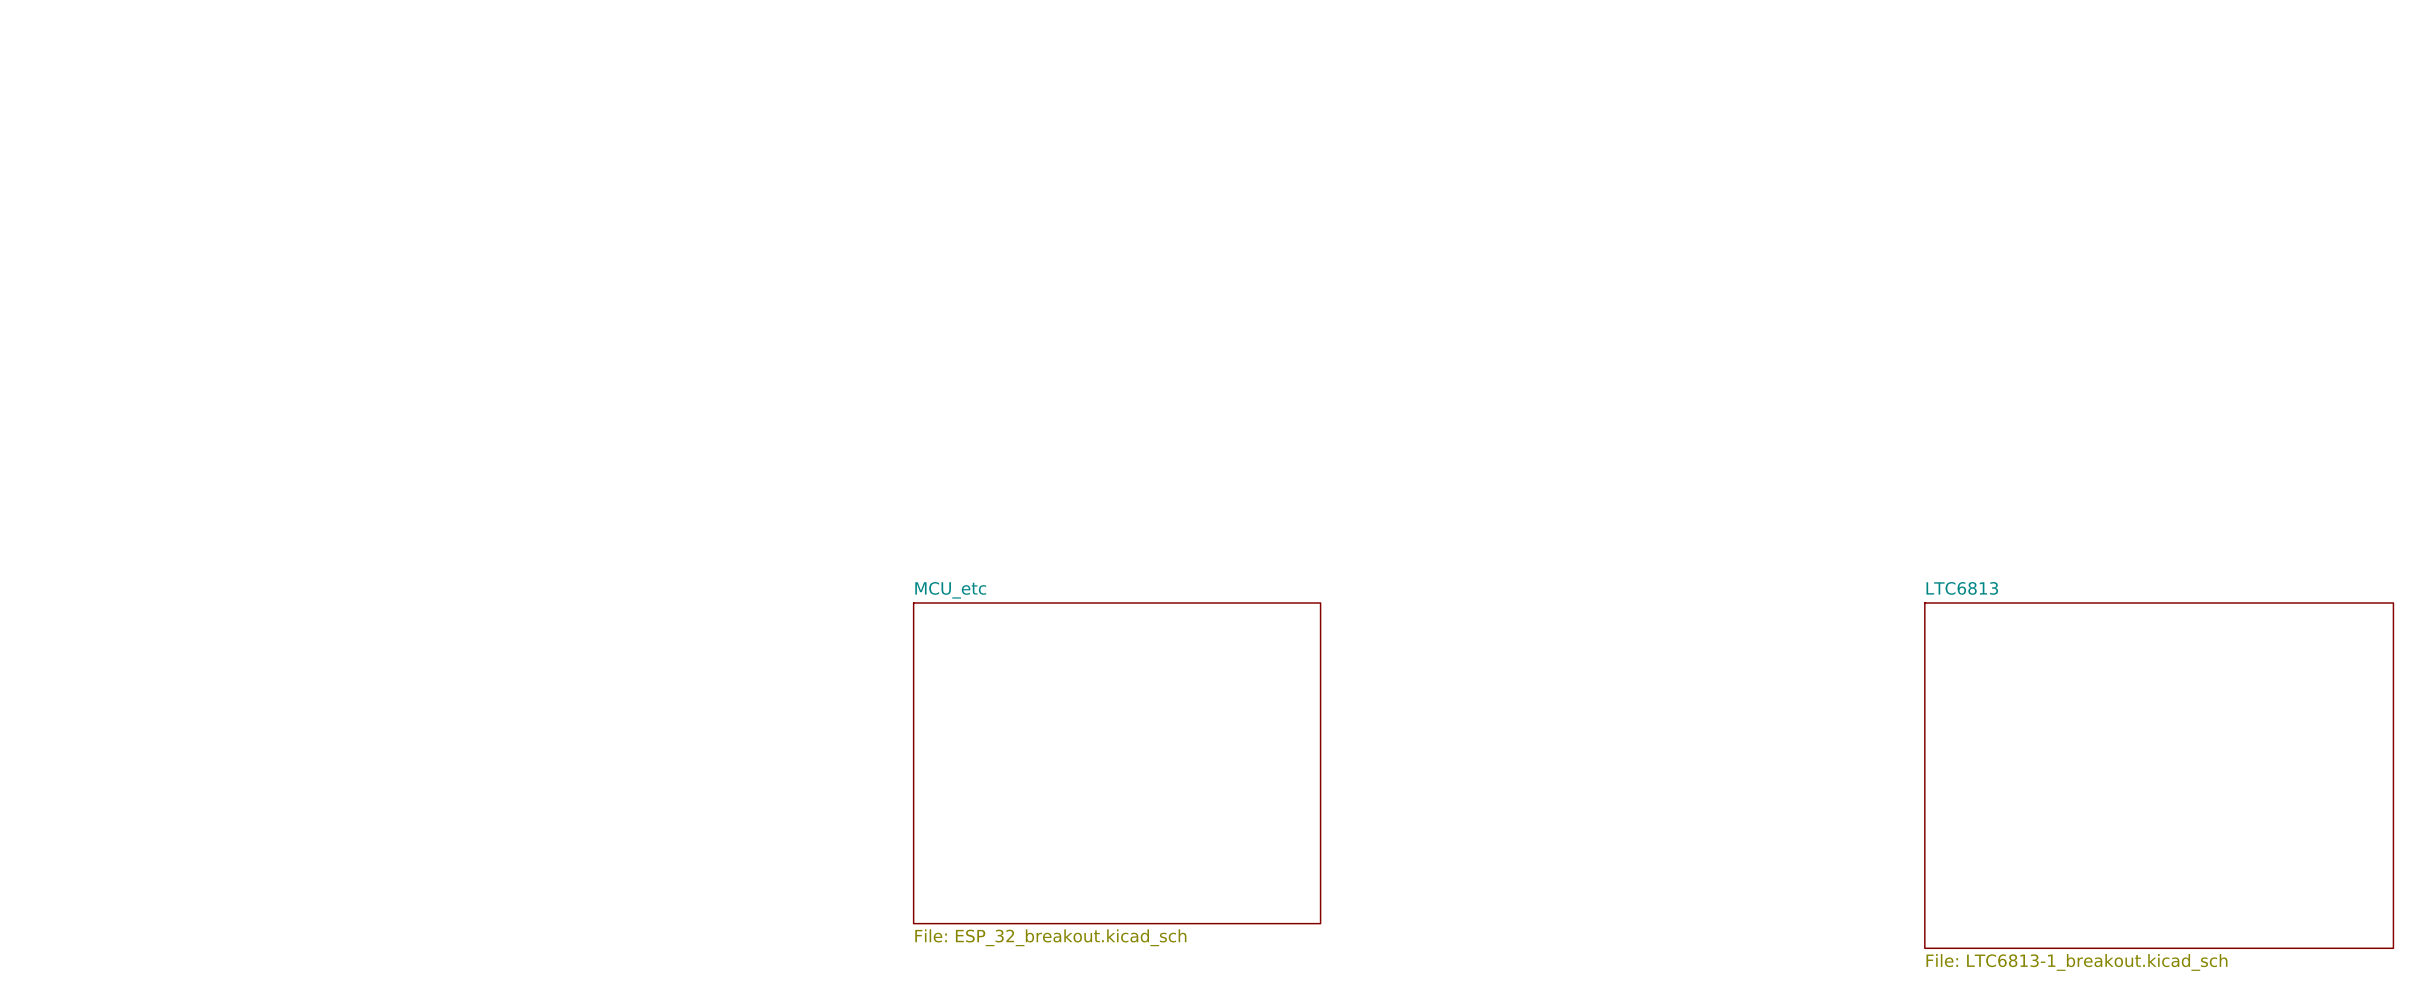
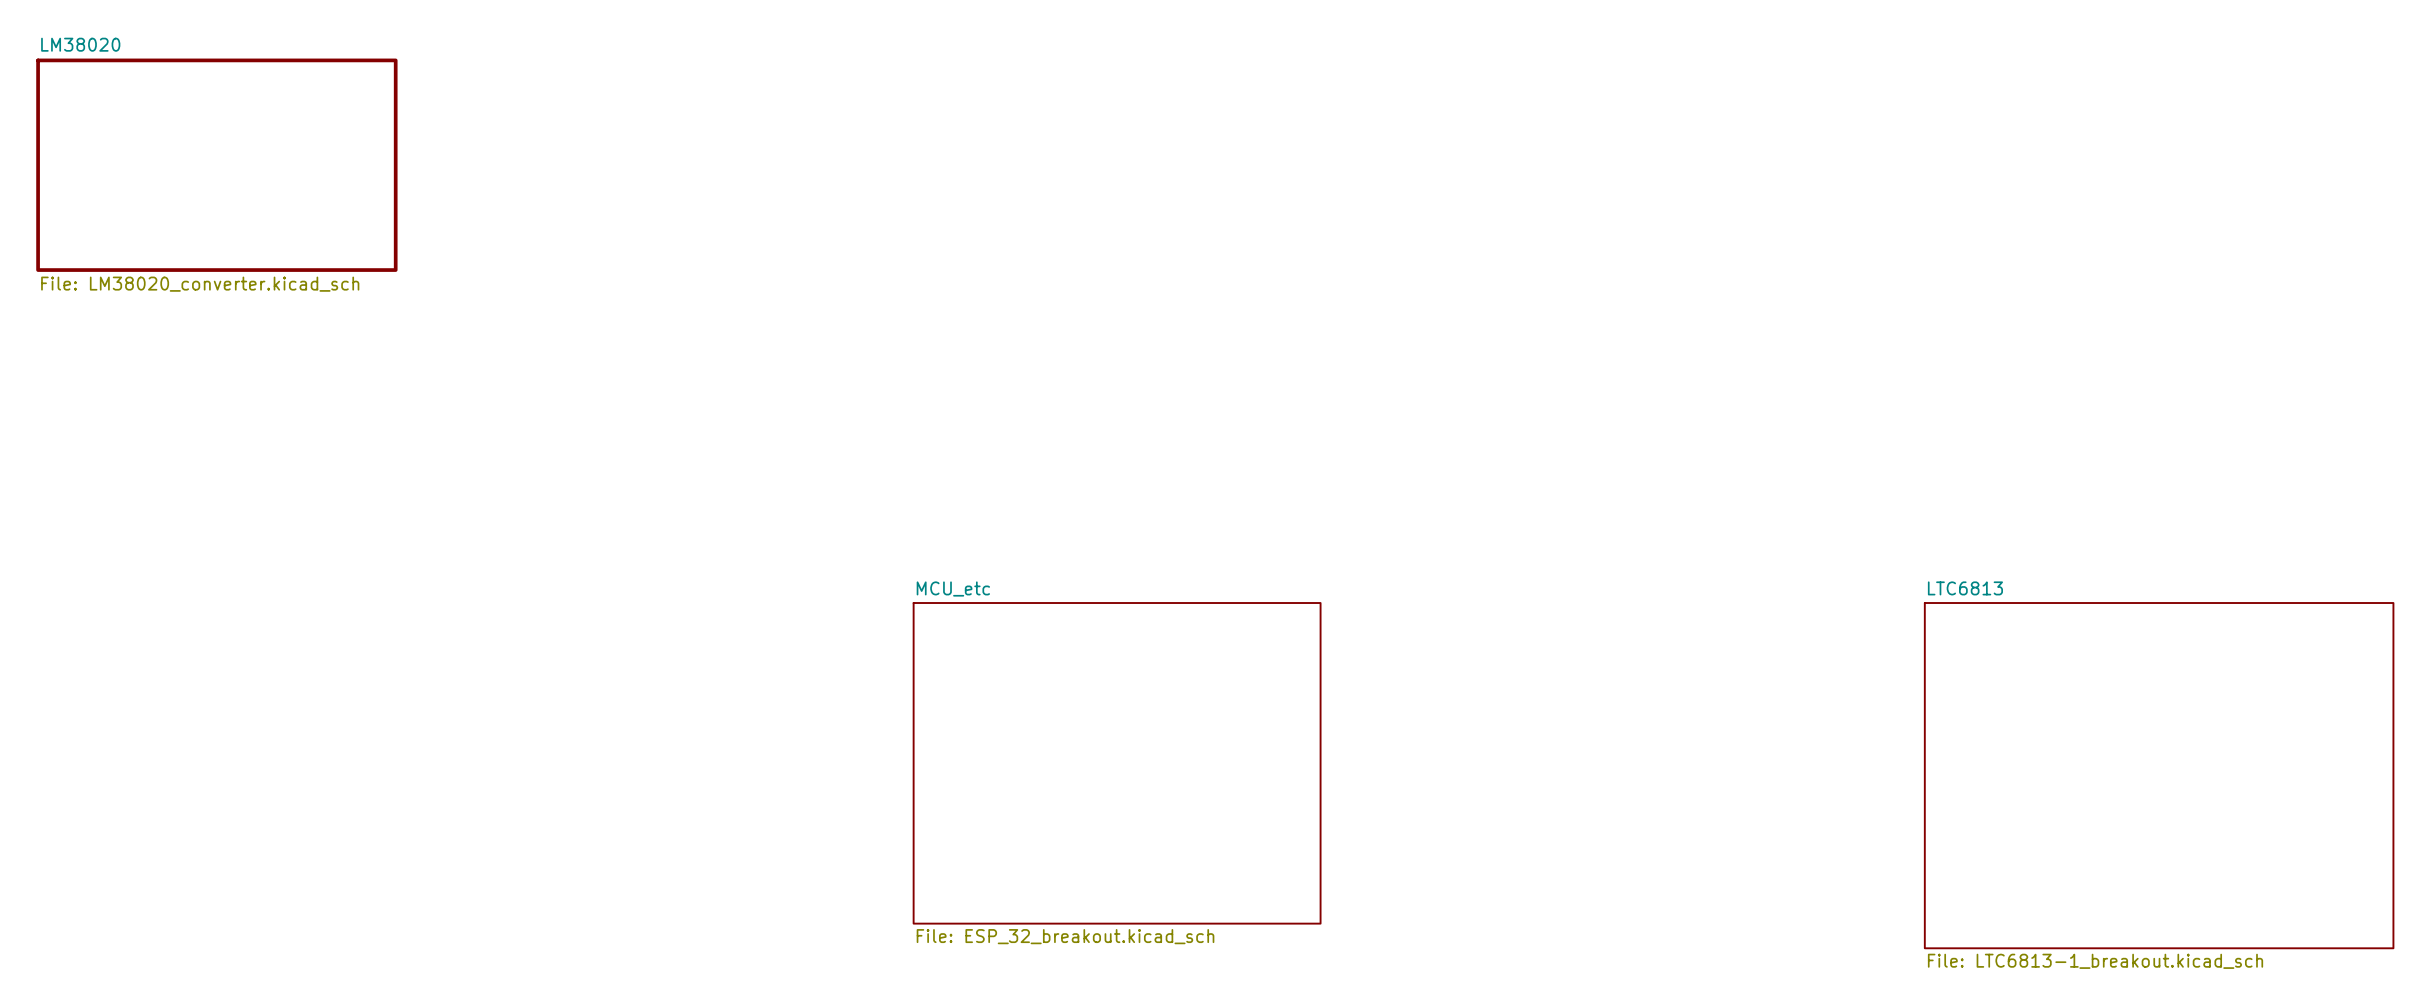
sheet LM38020: none -> File: LM38020_converter.kicad_sch (216, 165)

